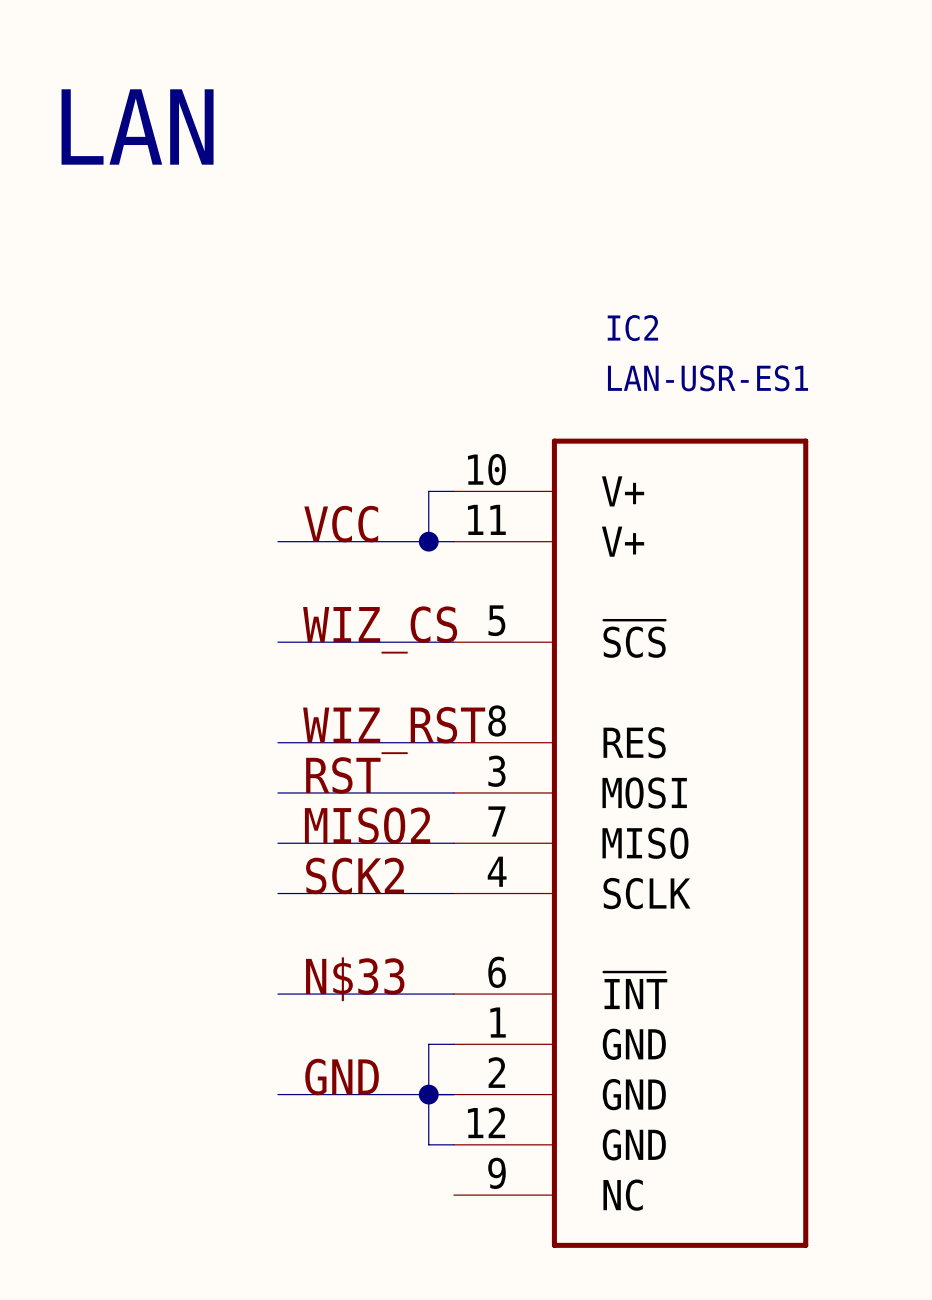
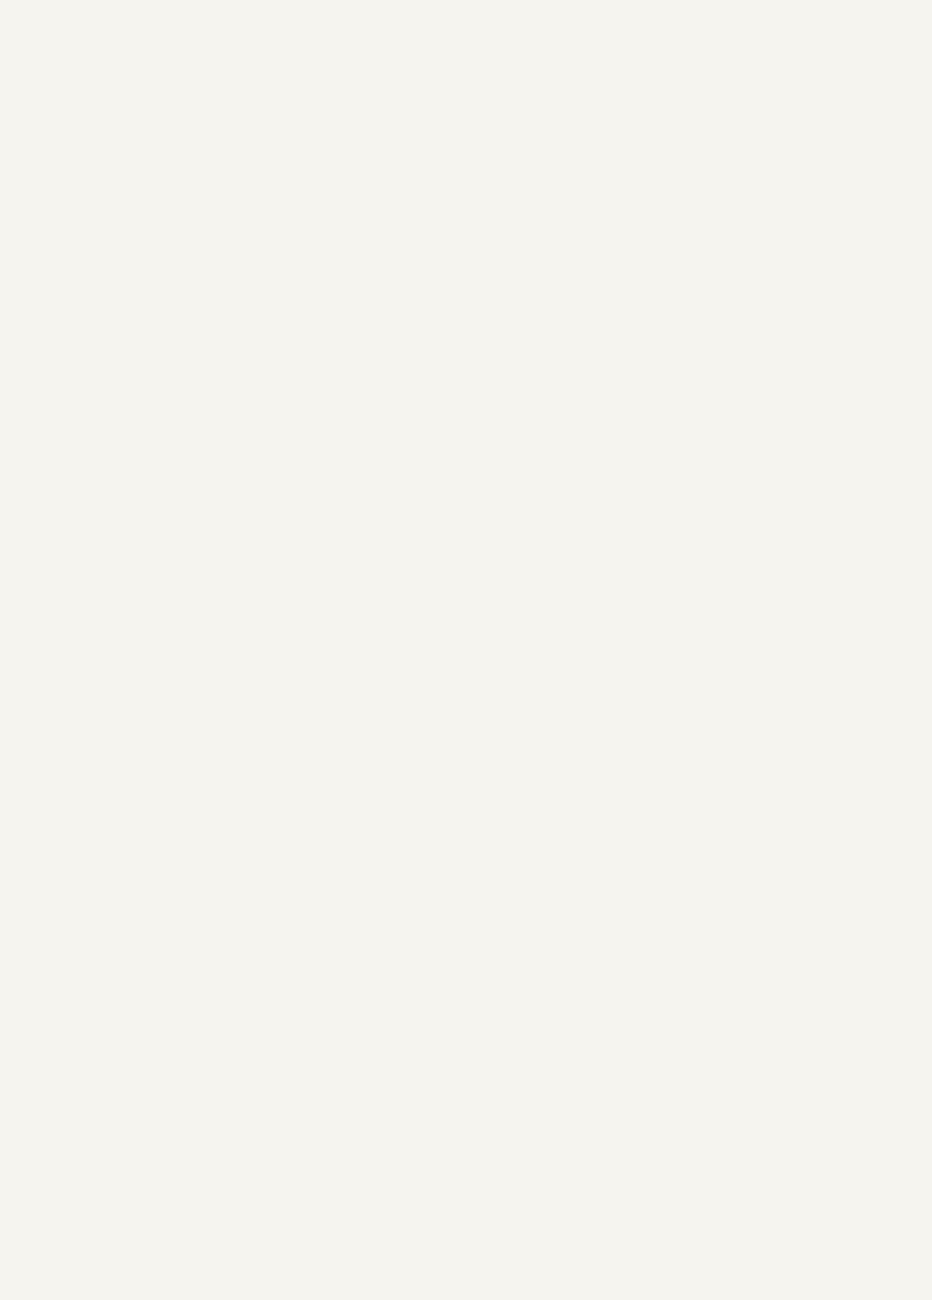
text: LAN (137, 126) -> none
wire: (453, 491) (428, 491) (428, 541) -> none
label: VCC (341, 524) -> none
wire: (277, 541) (453, 541) -> none
junction: (428, 541) -> none
label: WIZ_CS (380, 629) -> none
wire: (277, 642) (453, 642) -> none
label: WIZ_RST (394, 730) -> none
wire: (277, 742) (453, 742) -> none
label: RST (343, 775) -> none
wire: (277, 792) (453, 792) -> none
label: MISO2 (367, 825) -> none
wire: (277, 843) (453, 843) -> none
IC2: LAN-USR-ES1 (631, 843) -> none
label: SCK2 (355, 875) -> none
wire: (277, 893) (453, 893) -> none
label: N$33 (355, 979) -> none
wire: (277, 994) (453, 994) -> none
wire: (453, 1044) (428, 1044) (428, 1144) (453, 1144) -> none
label: GND (342, 1077) -> none
wire: (277, 1094) (453, 1094) -> none
junction: (428, 1094) -> none

